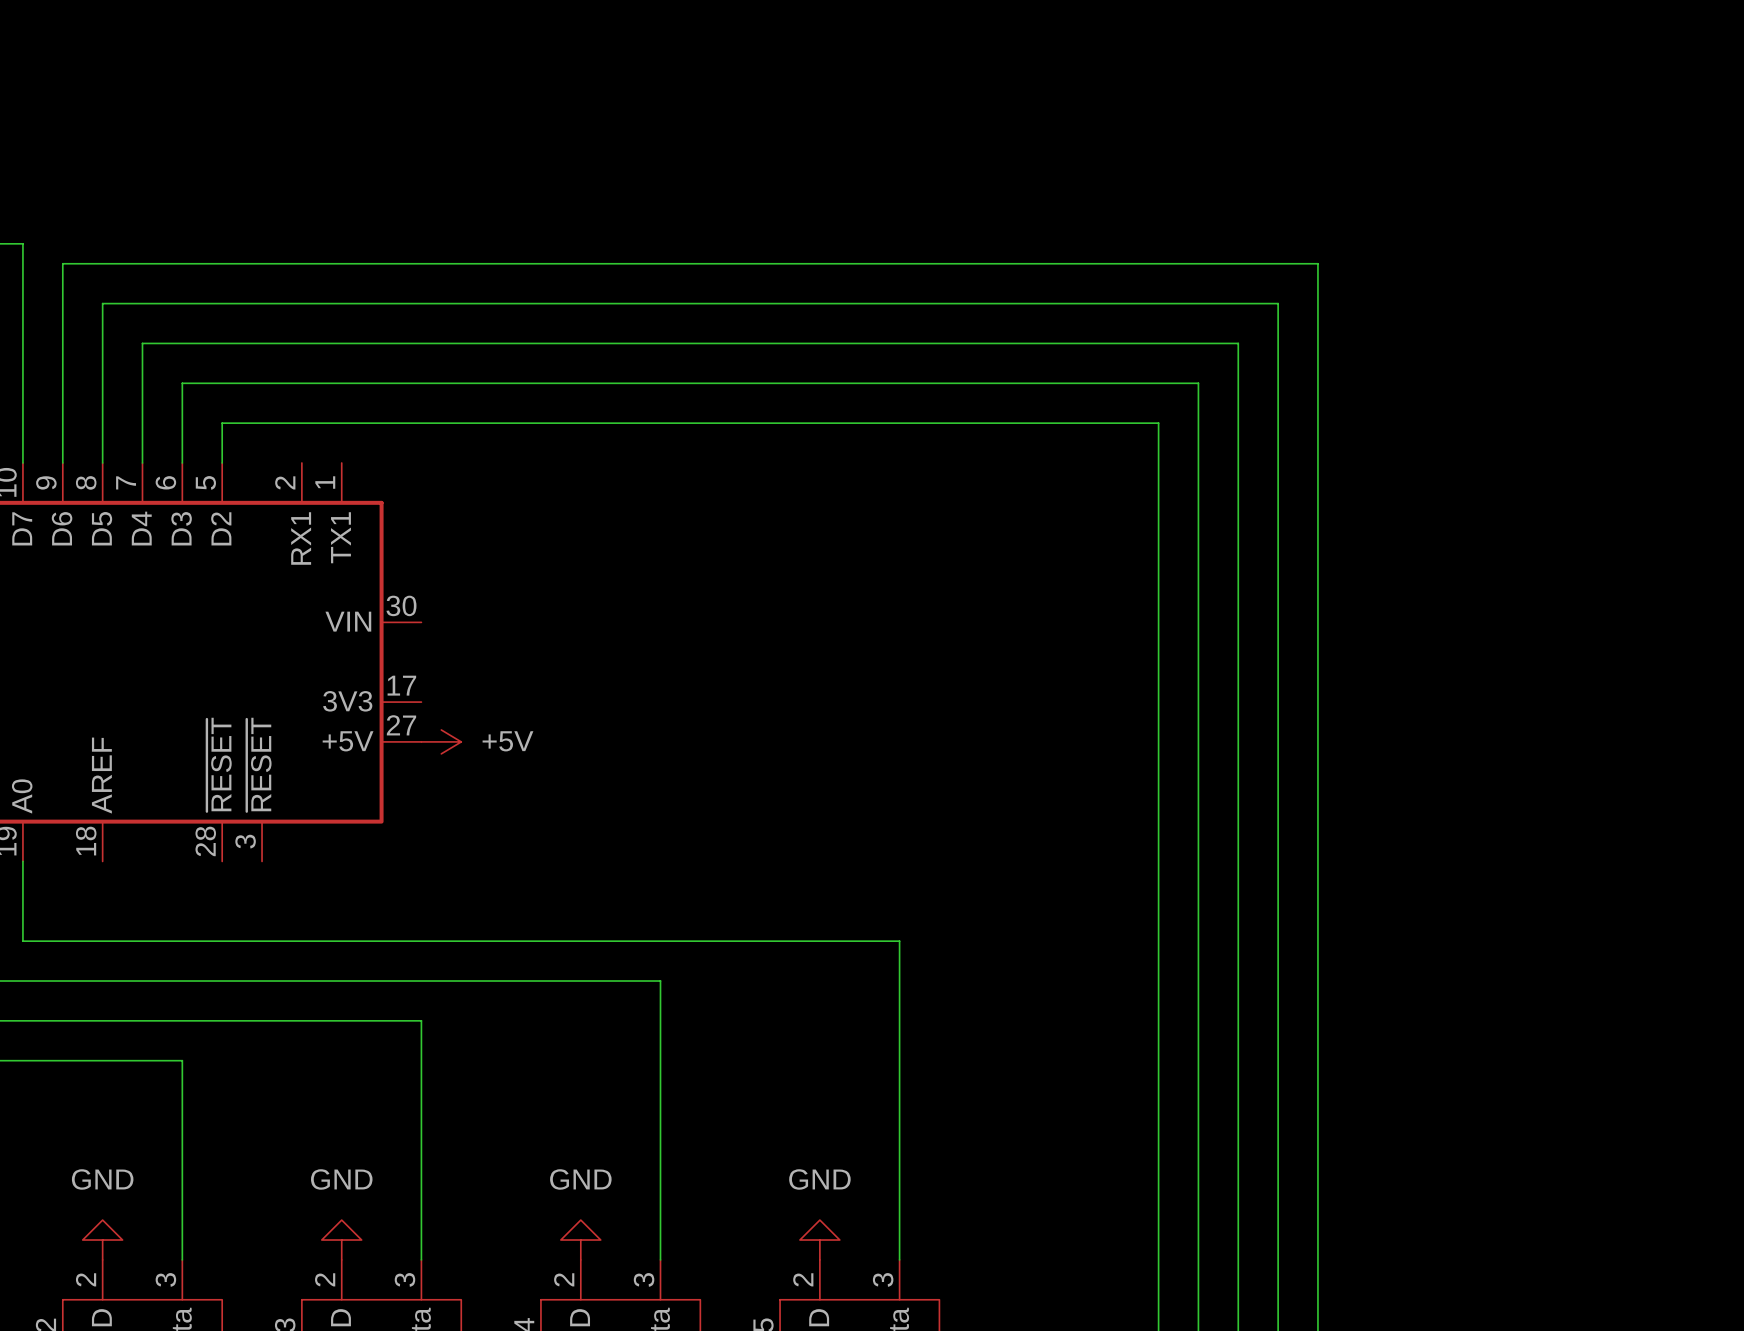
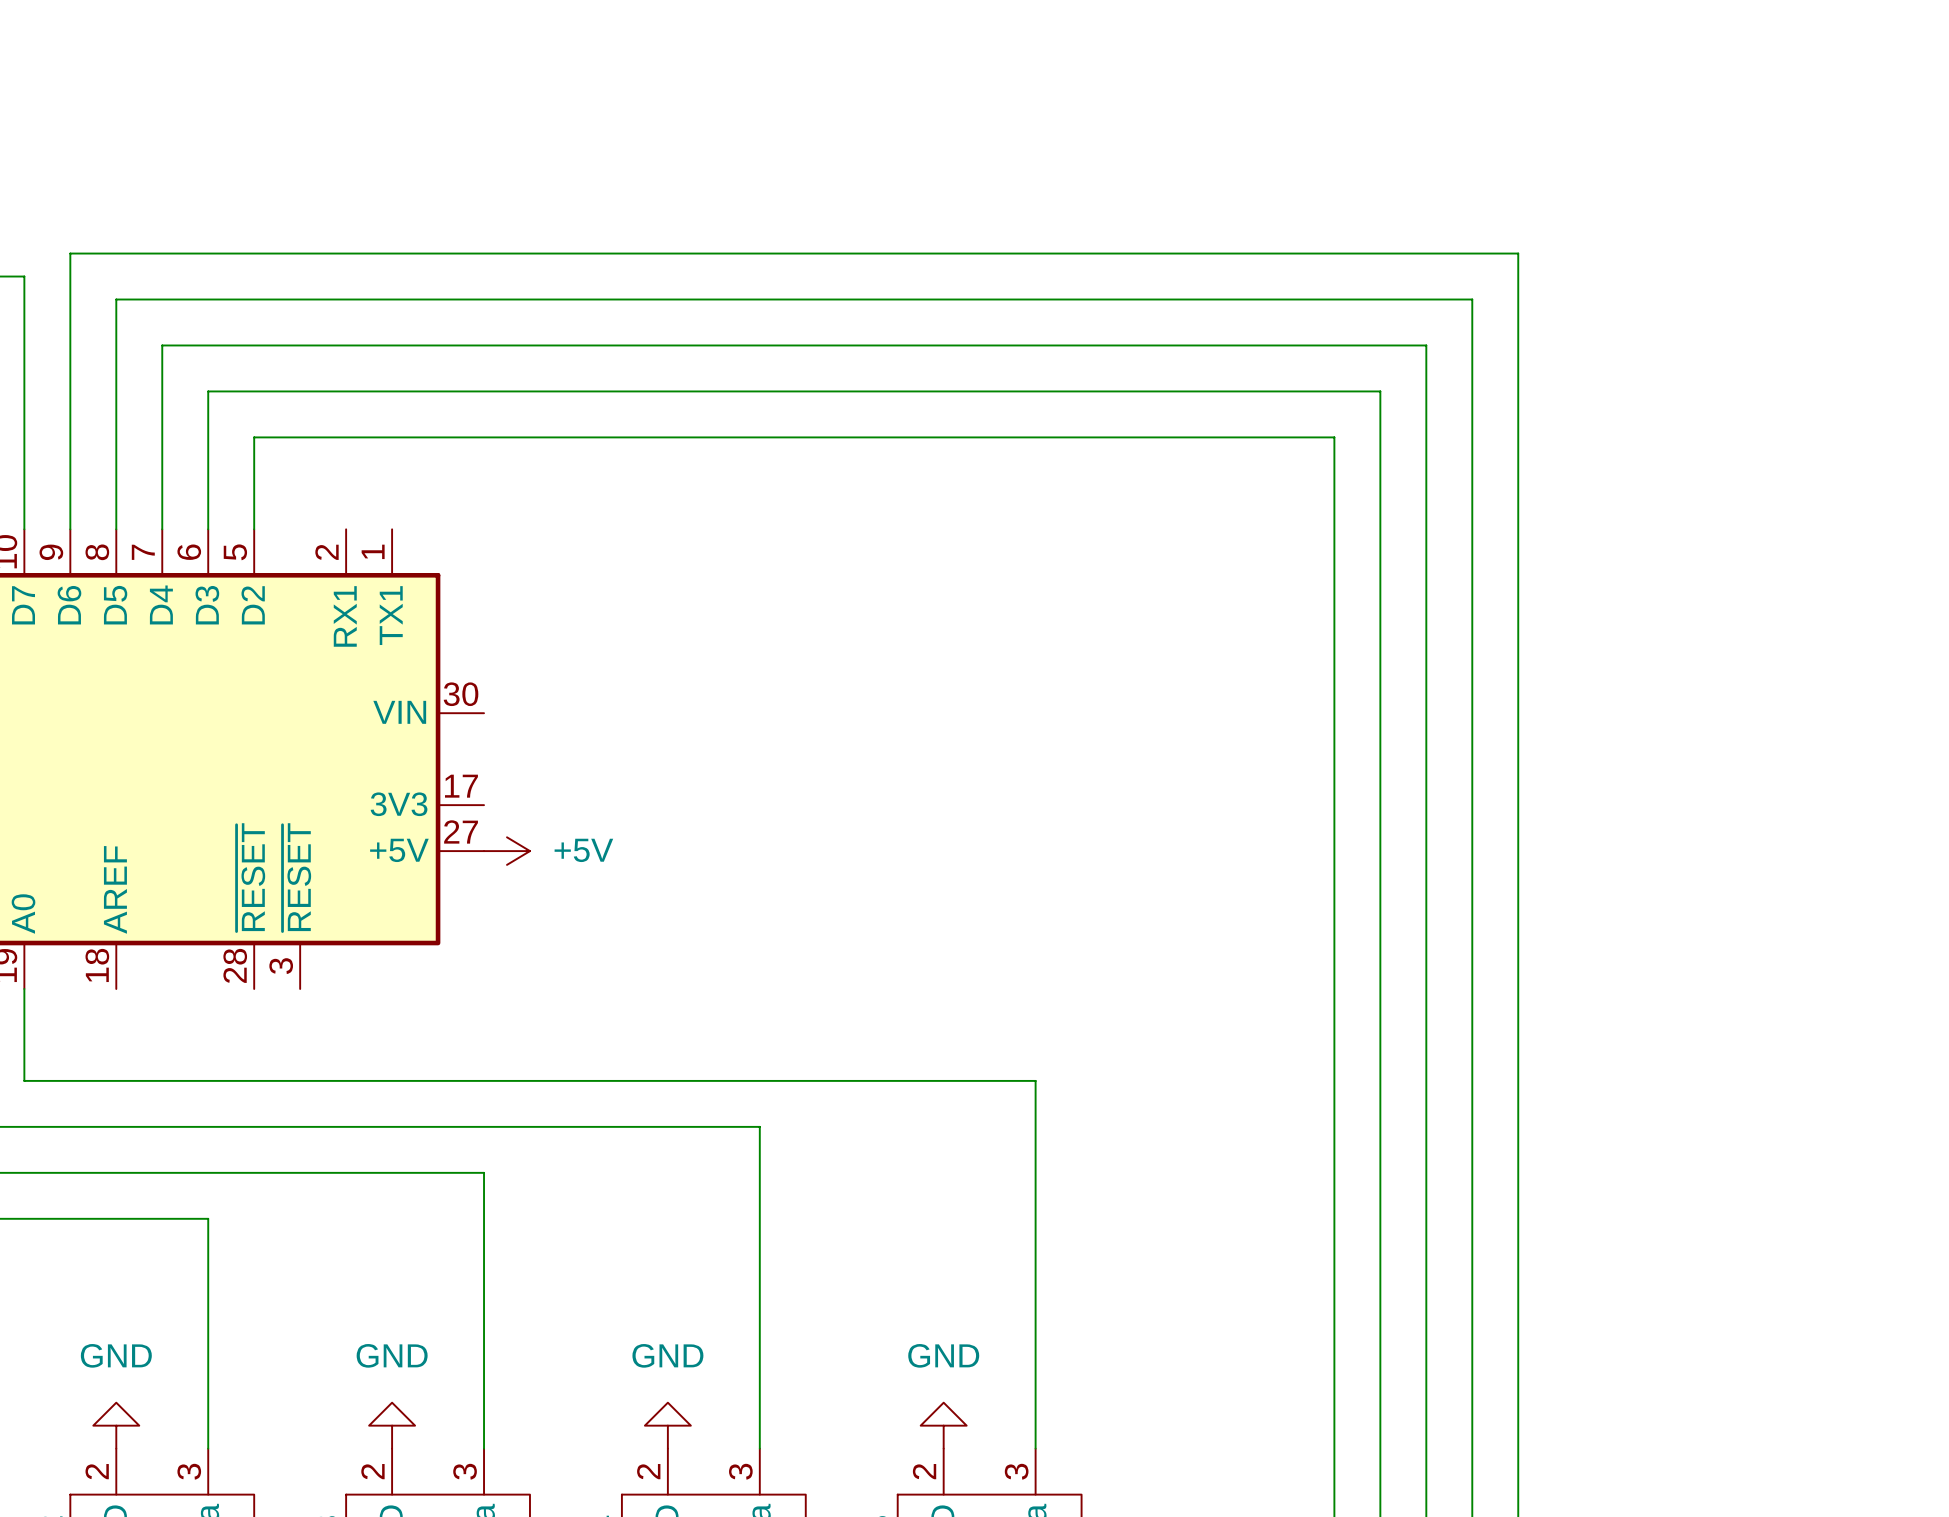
wire: (62, 263) (102, 263) -> (70, 299) (70, 253) (1518, 253) (1518, 299)
wire: (1278, 263) (1317, 263) -> (1472, 299) (1472, 345)
wire: (102, 303) (142, 303) -> (116, 345) (116, 299)
wire: (1238, 303) (1278, 303) -> none
wire: (142, 343) (182, 343) -> (162, 391) (162, 345)
wire: none -> (208, 391) (208, 437)
wire: (1198, 343) (1238, 343) -> (1426, 345) (1426, 391)
wire: none -> (1380, 391) (1380, 437)
wire: (182, 383) (222, 383) -> (254, 483) (254, 437)
wire: (1158, 383) (1198, 383) -> (1334, 437) (1334, 483)
wire: (222, 423) (1158, 423) -> none

